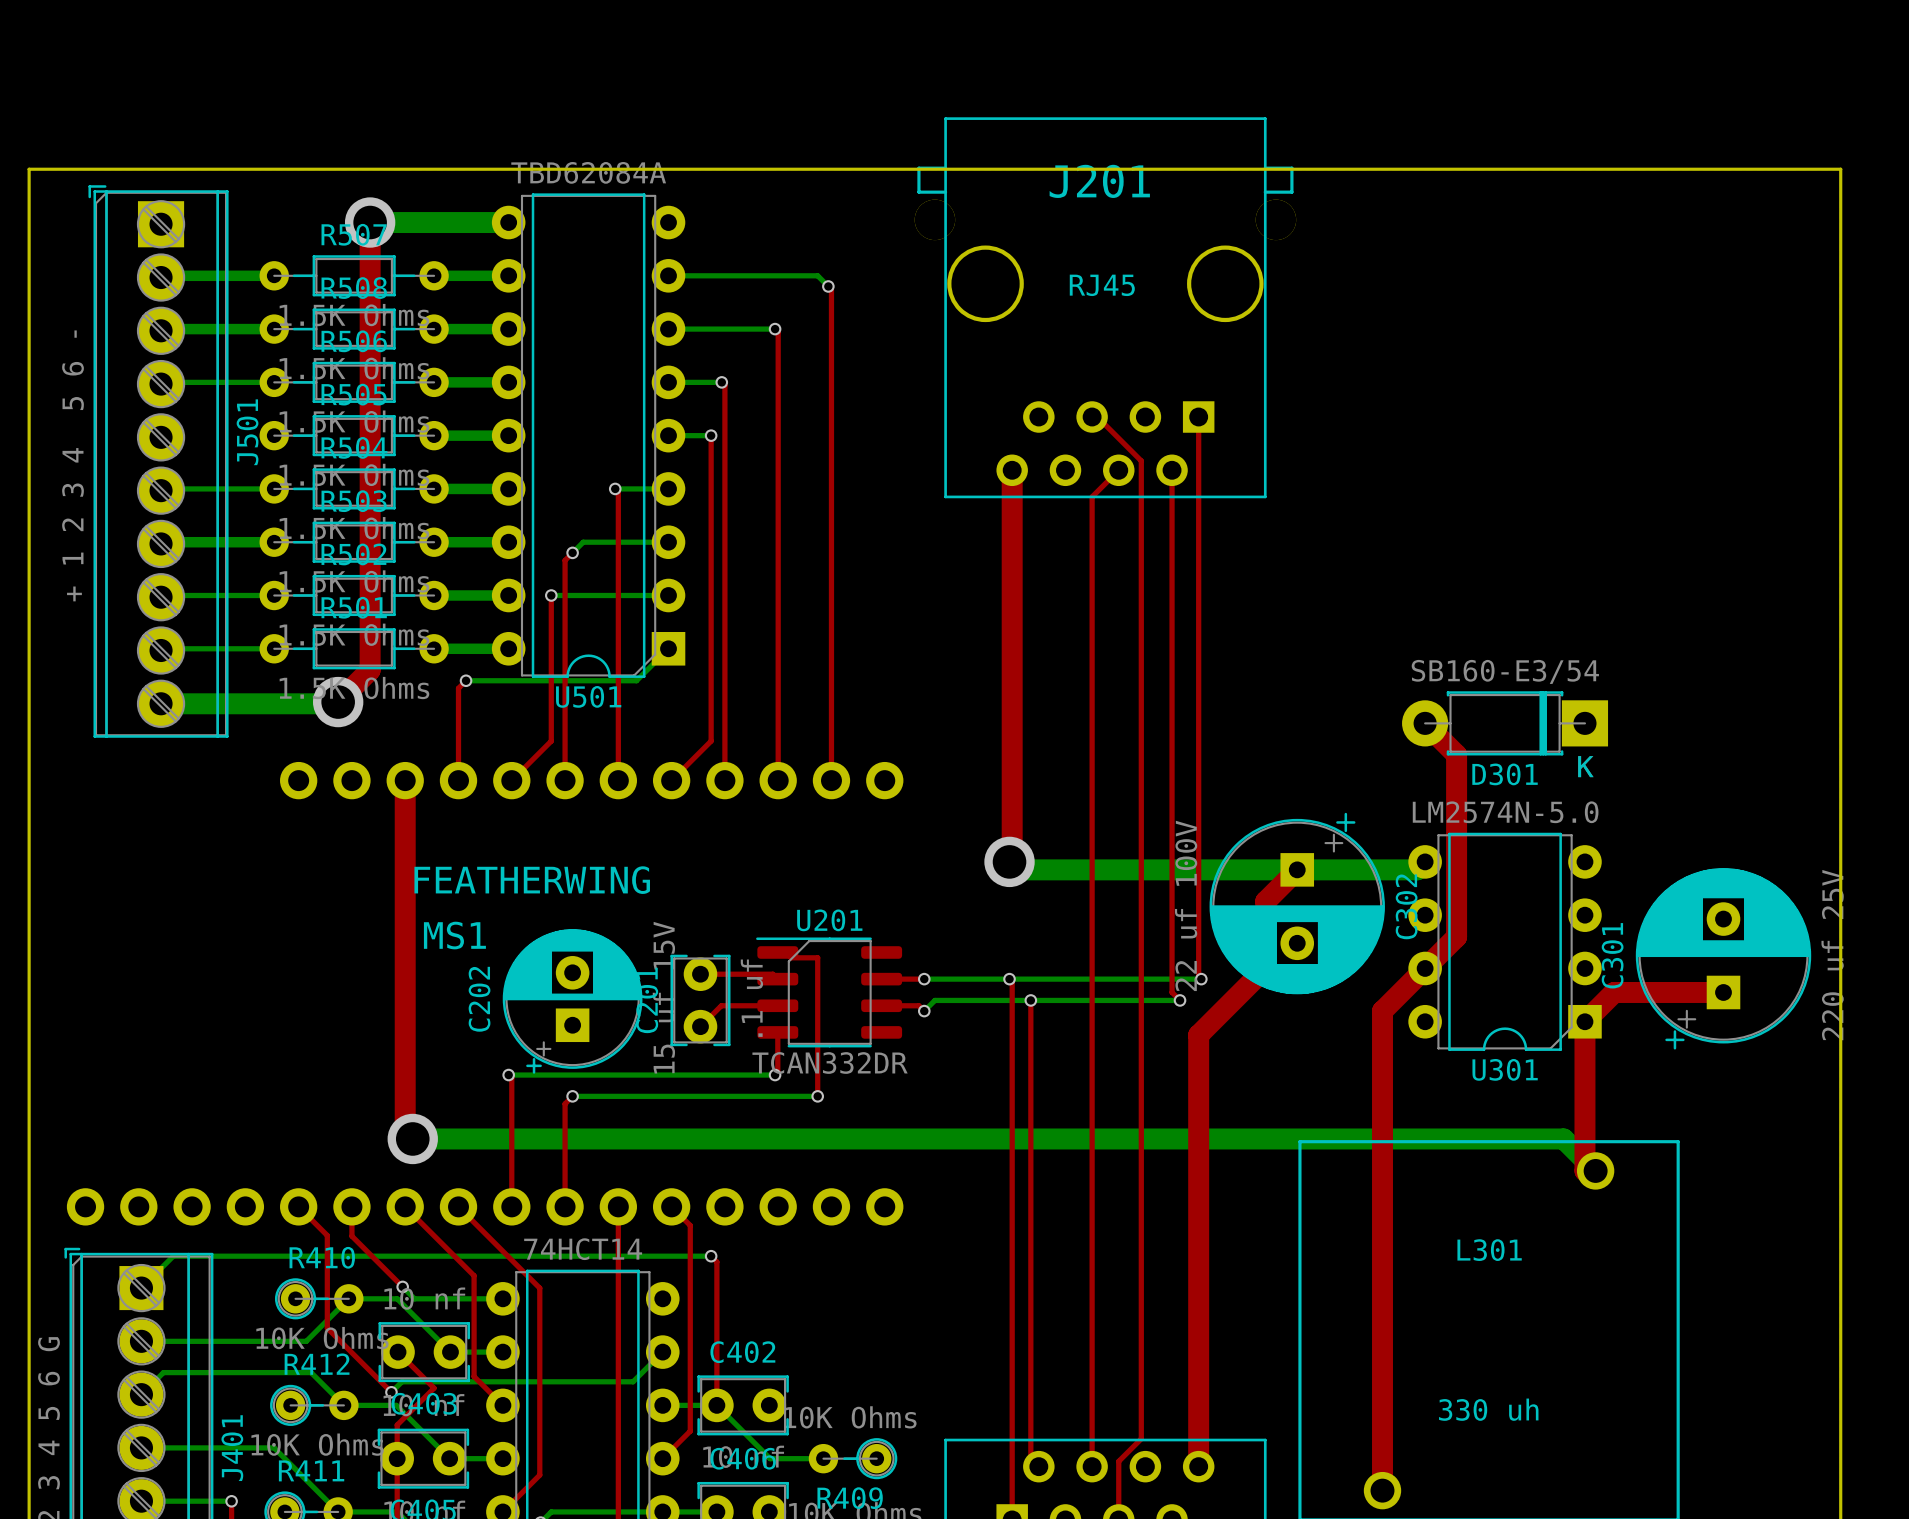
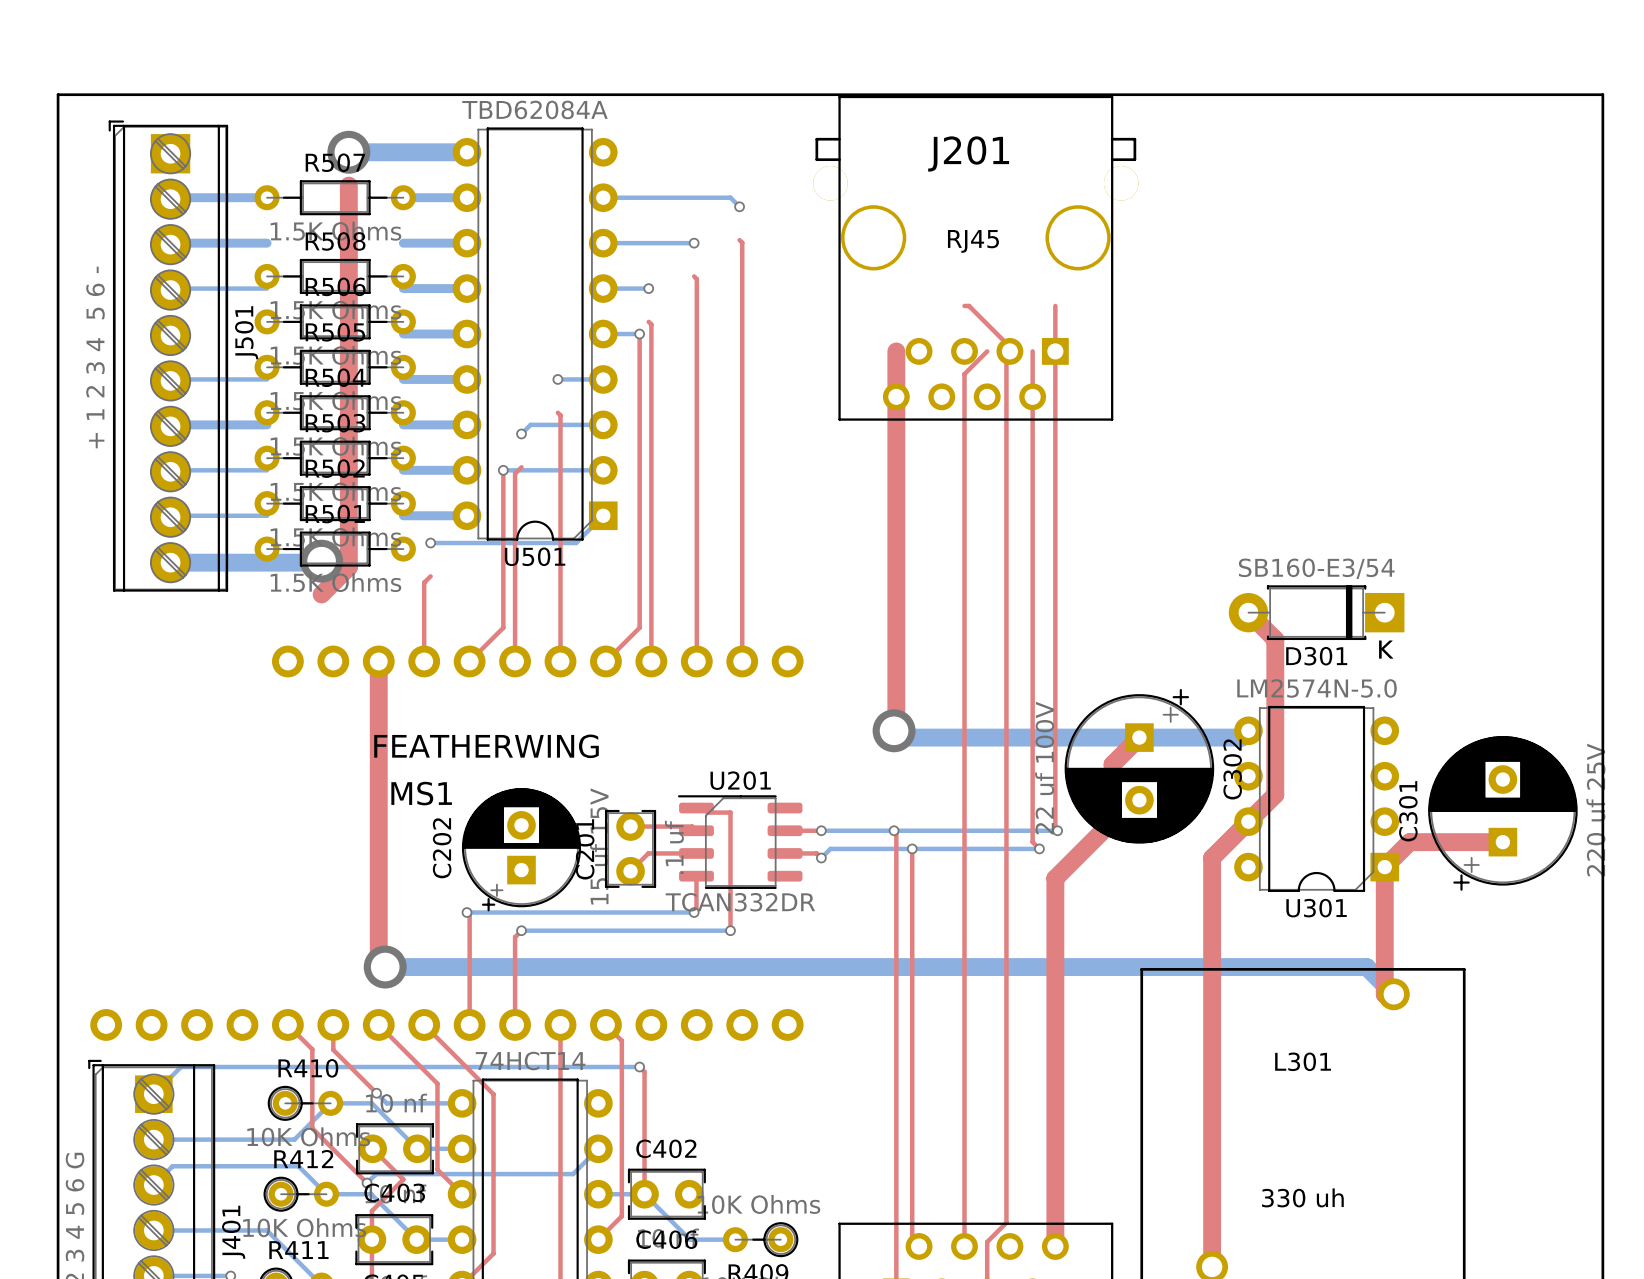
board edge: (29, 169) (1840, 169) -> (58, 140) (58, 94) (1602, 94) (1602, 140)
bottom track: (370, 222) (508, 222) -> (348, 152) (466, 152)
via position: (370, 222) -> (348, 152)
via: none -> (739, 206)
bottom track: (274, 275) (162, 275) (161, 277) -> (267, 197) (170, 199)
R507 position: (354, 275) -> (335, 197)
bottom track: (434, 275) (508, 275) -> (403, 197) (466, 197)
bottom track: (668, 275) (817, 275) (828, 286) -> (603, 197) (730, 197) (739, 206)
via: (828, 286) -> none
via: none -> (694, 243)
bottom track: (274, 329) (162, 329) (161, 330) -> (267, 243) (170, 244)
bottom track: (434, 329) (508, 329) -> (403, 243) (466, 243)
bottom track: (668, 329) (775, 329) -> (603, 243) (694, 243)
via: (775, 329) -> none
via: none -> (648, 288)
top track: none -> (1055, 305) (1055, 351)
bottom track: (274, 382) (162, 382) (161, 384) -> (267, 288) (170, 290)
bottom track: (434, 382) (508, 382) -> (403, 288) (466, 288)
bottom track: (668, 382) (721, 382) -> (603, 288) (648, 288)
via position: (721, 382) -> (639, 334)
top track: none -> (639, 334) (639, 367)
top track: none -> (896, 351) (896, 396)
top track: (1092, 417) (1097, 417) (1141, 460) -> (964, 305) (968, 305) (1006, 343) (1006, 388)
top track: none -> (1032, 351) (1032, 396)
bottom track: (434, 435) (508, 435) -> (403, 334) (466, 334)
U501 position: (588, 435) -> (535, 334)
bottom track: (668, 435) (711, 435) -> (603, 334) (639, 334)
via: (711, 435) -> none
via: none -> (557, 379)
J501 position: (158, 461) -> (168, 356)
top track: (1118, 470) (1092, 496) -> (987, 351) (964, 374) (964, 419)
bottom track: (274, 488) (162, 488) (161, 490) -> (267, 379) (170, 380)
bottom track: (434, 488) (508, 488) -> (403, 379) (466, 379)
bottom track: (615, 488) (668, 488) -> (557, 379) (603, 379)
via: (615, 488) -> none
via: none -> (521, 433)
bottom track: (274, 542) (162, 542) (161, 543) -> (267, 424) (170, 426)
bottom track: (434, 542) (508, 542) -> (403, 424) (466, 424)
bottom track: (668, 542) (583, 542) (572, 552) -> (603, 424) (530, 424) (521, 433)
via: (572, 552) -> none
top track: none -> (503, 470) (503, 503)
via: none -> (503, 470)
bottom track: (274, 595) (162, 595) (161, 597) -> (267, 470) (170, 471)
bottom track: (434, 595) (508, 595) -> (403, 470) (466, 470)
bottom track: (551, 595) (668, 595) -> (503, 470) (603, 470)
via: (551, 595) -> none
bottom track: (274, 648) (162, 648) (161, 650) -> (267, 515) (170, 517)
bottom track: (434, 648) (508, 648) -> (403, 515) (466, 515)
bottom track: (668, 648) (636, 680) (466, 680) -> (603, 515) (576, 543) (430, 543)
via position: (466, 680) -> (430, 543)
bottom track: (338, 702) (336, 703) (161, 703) -> (321, 561) (170, 562)
via position: (338, 702) -> (321, 561)

